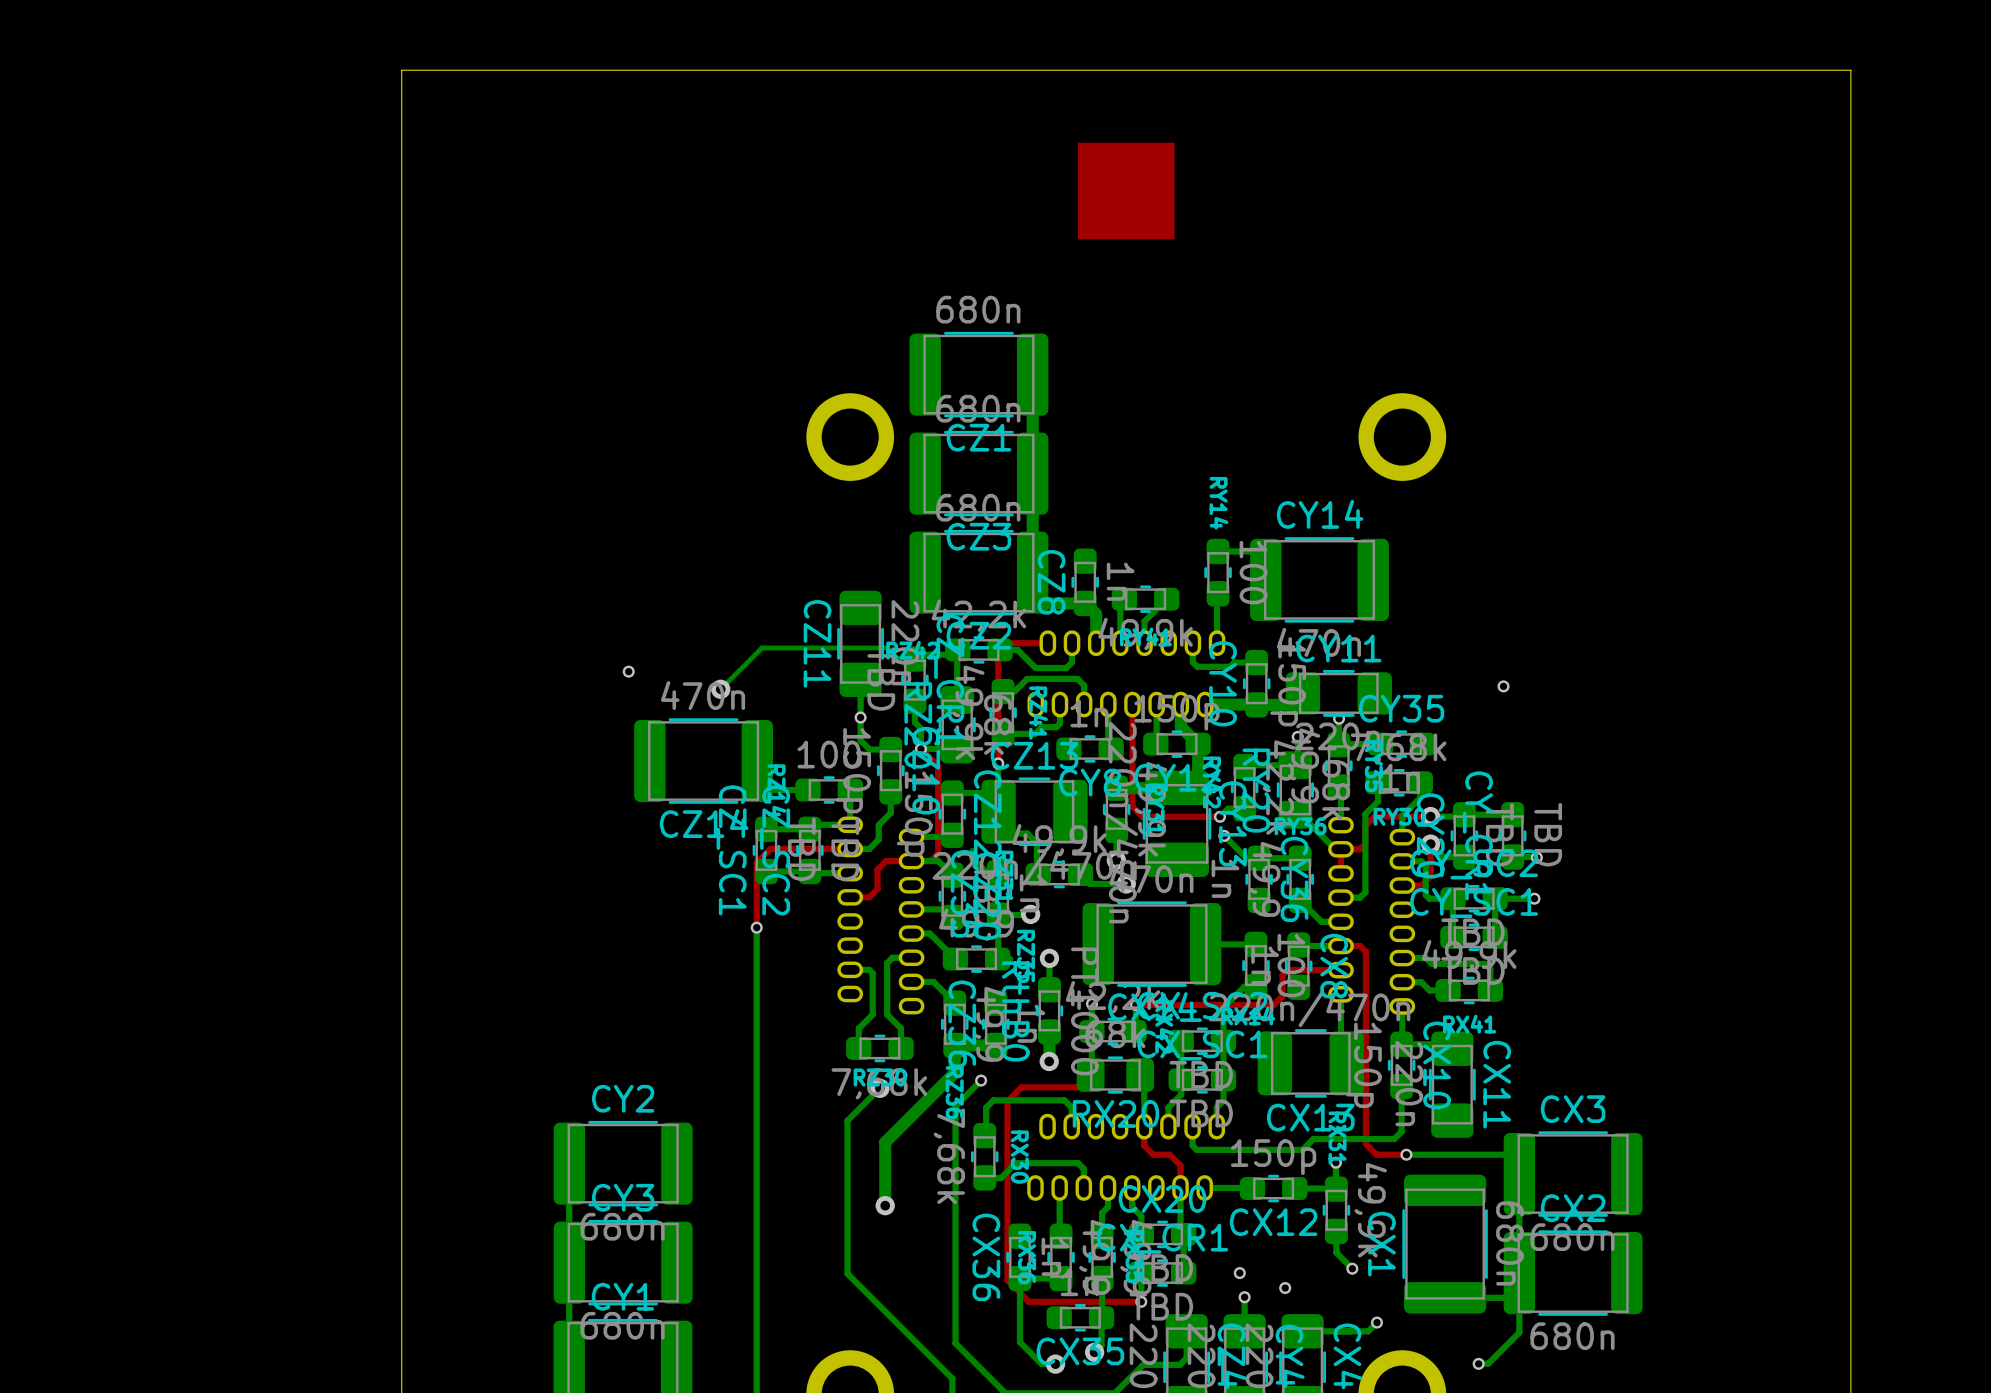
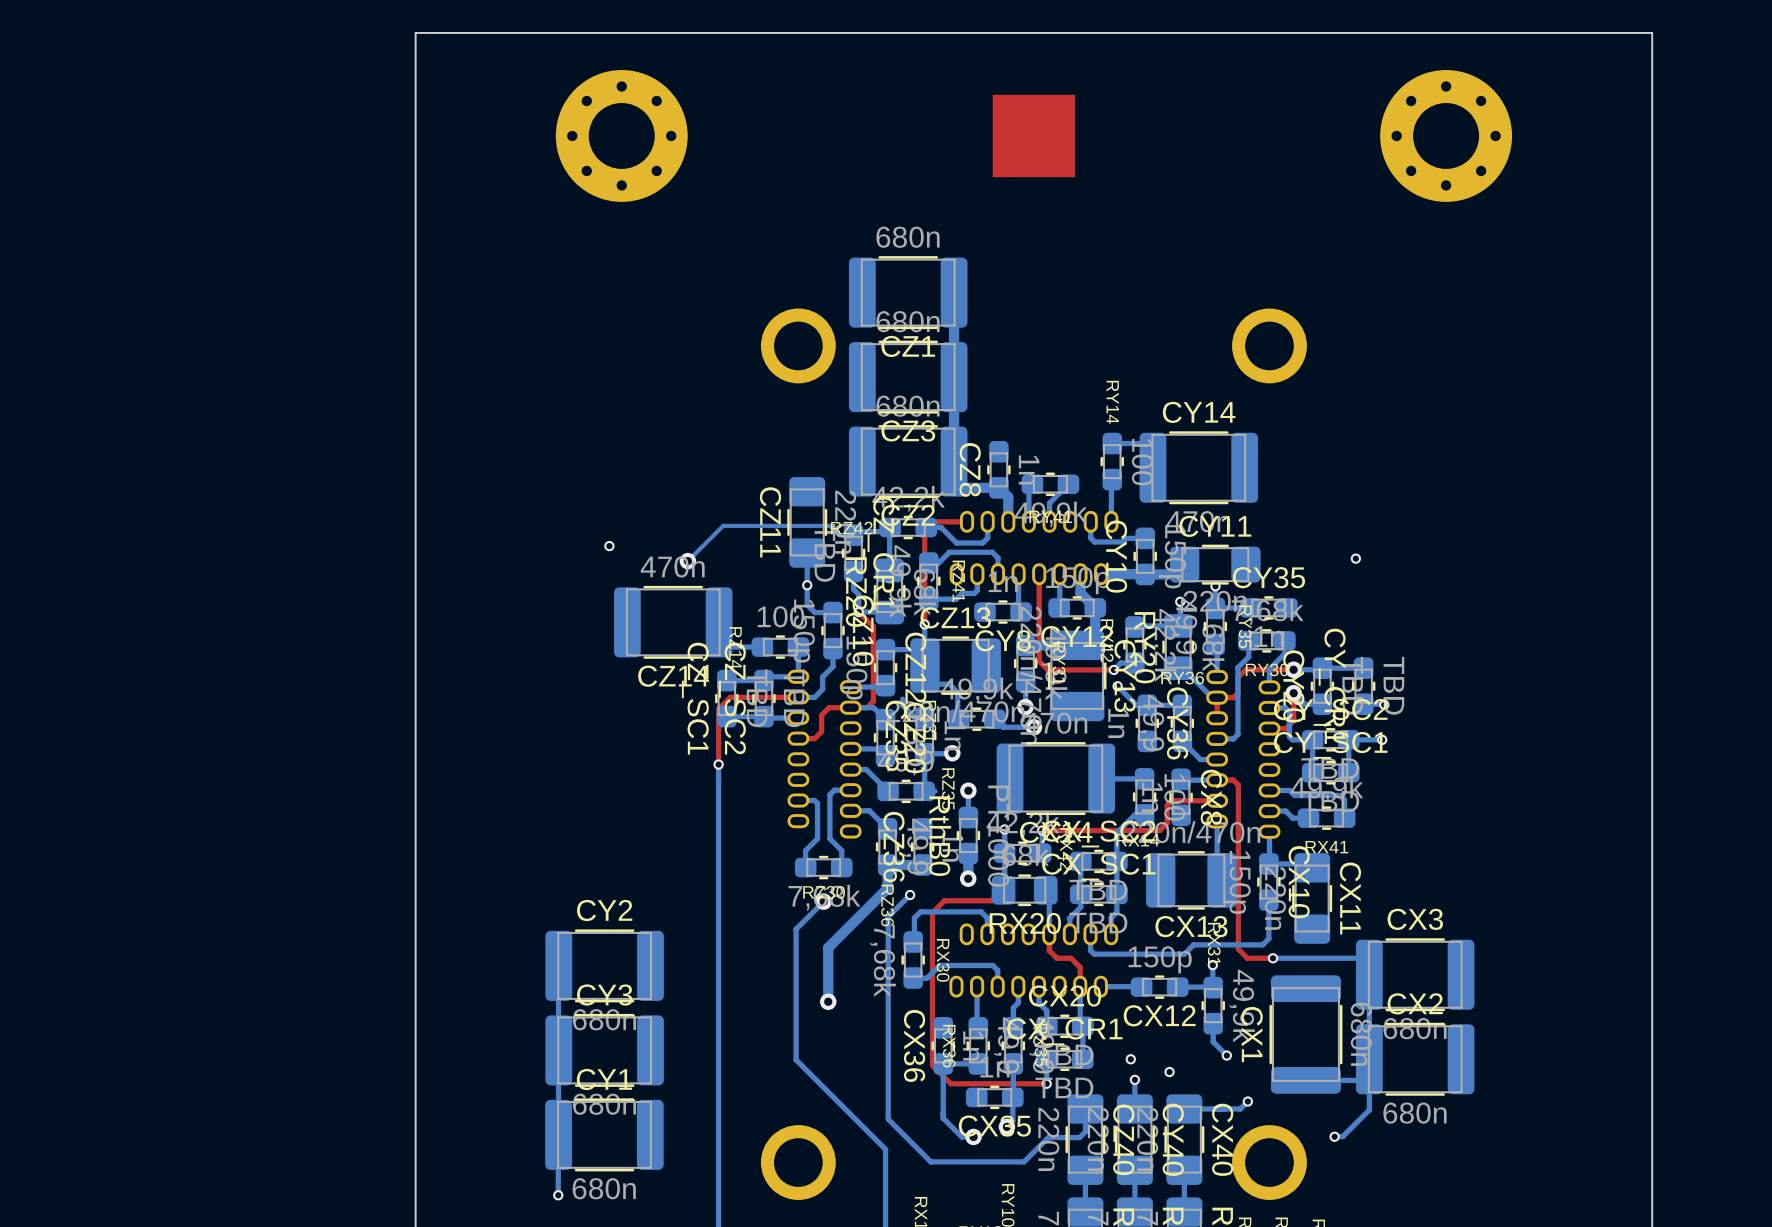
part: none -> (621, 135)
part: none -> (1446, 135)

